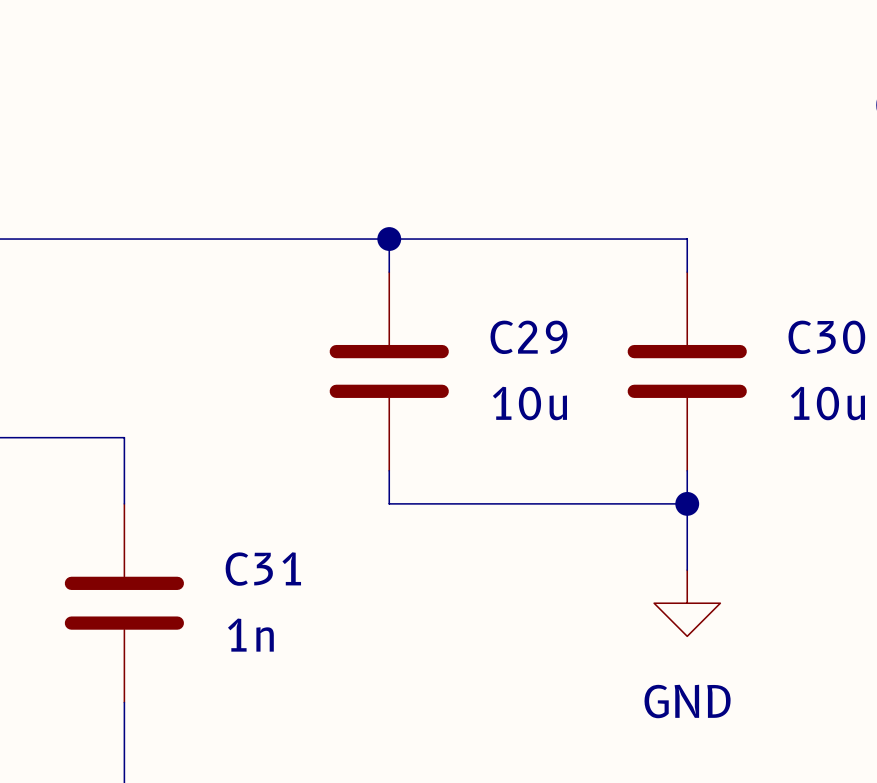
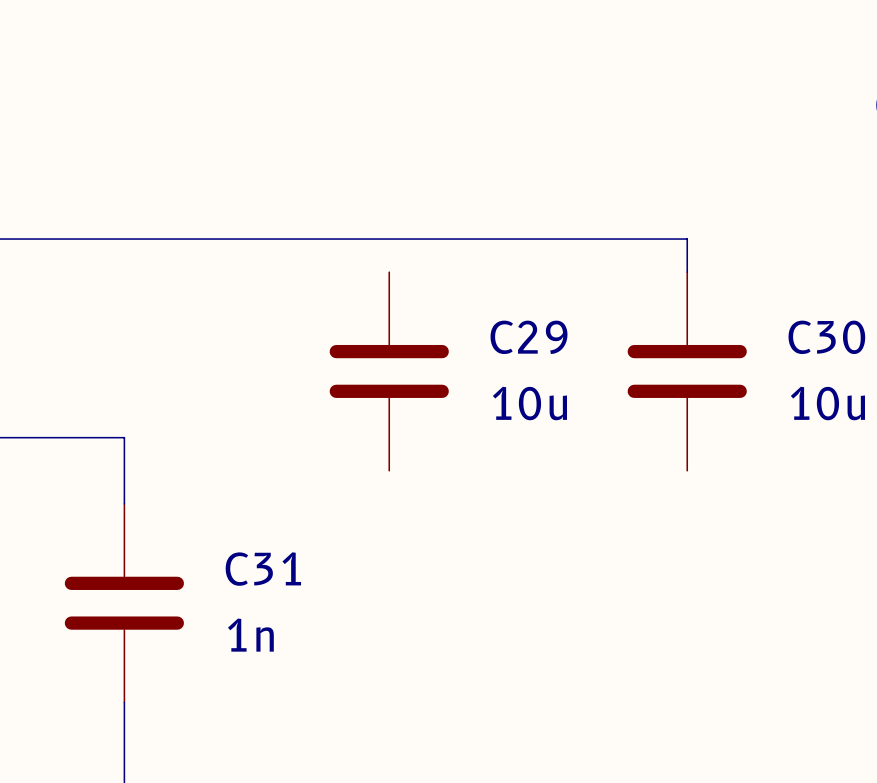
wire: (389, 239) (389, 272) -> none
junction: (389, 239) -> none
wire: (389, 470) (389, 503) (687, 503) -> none
wire: (687, 470) (687, 570) -> none
junction: (687, 503) -> none
power symbol: GND (687, 603) -> none

